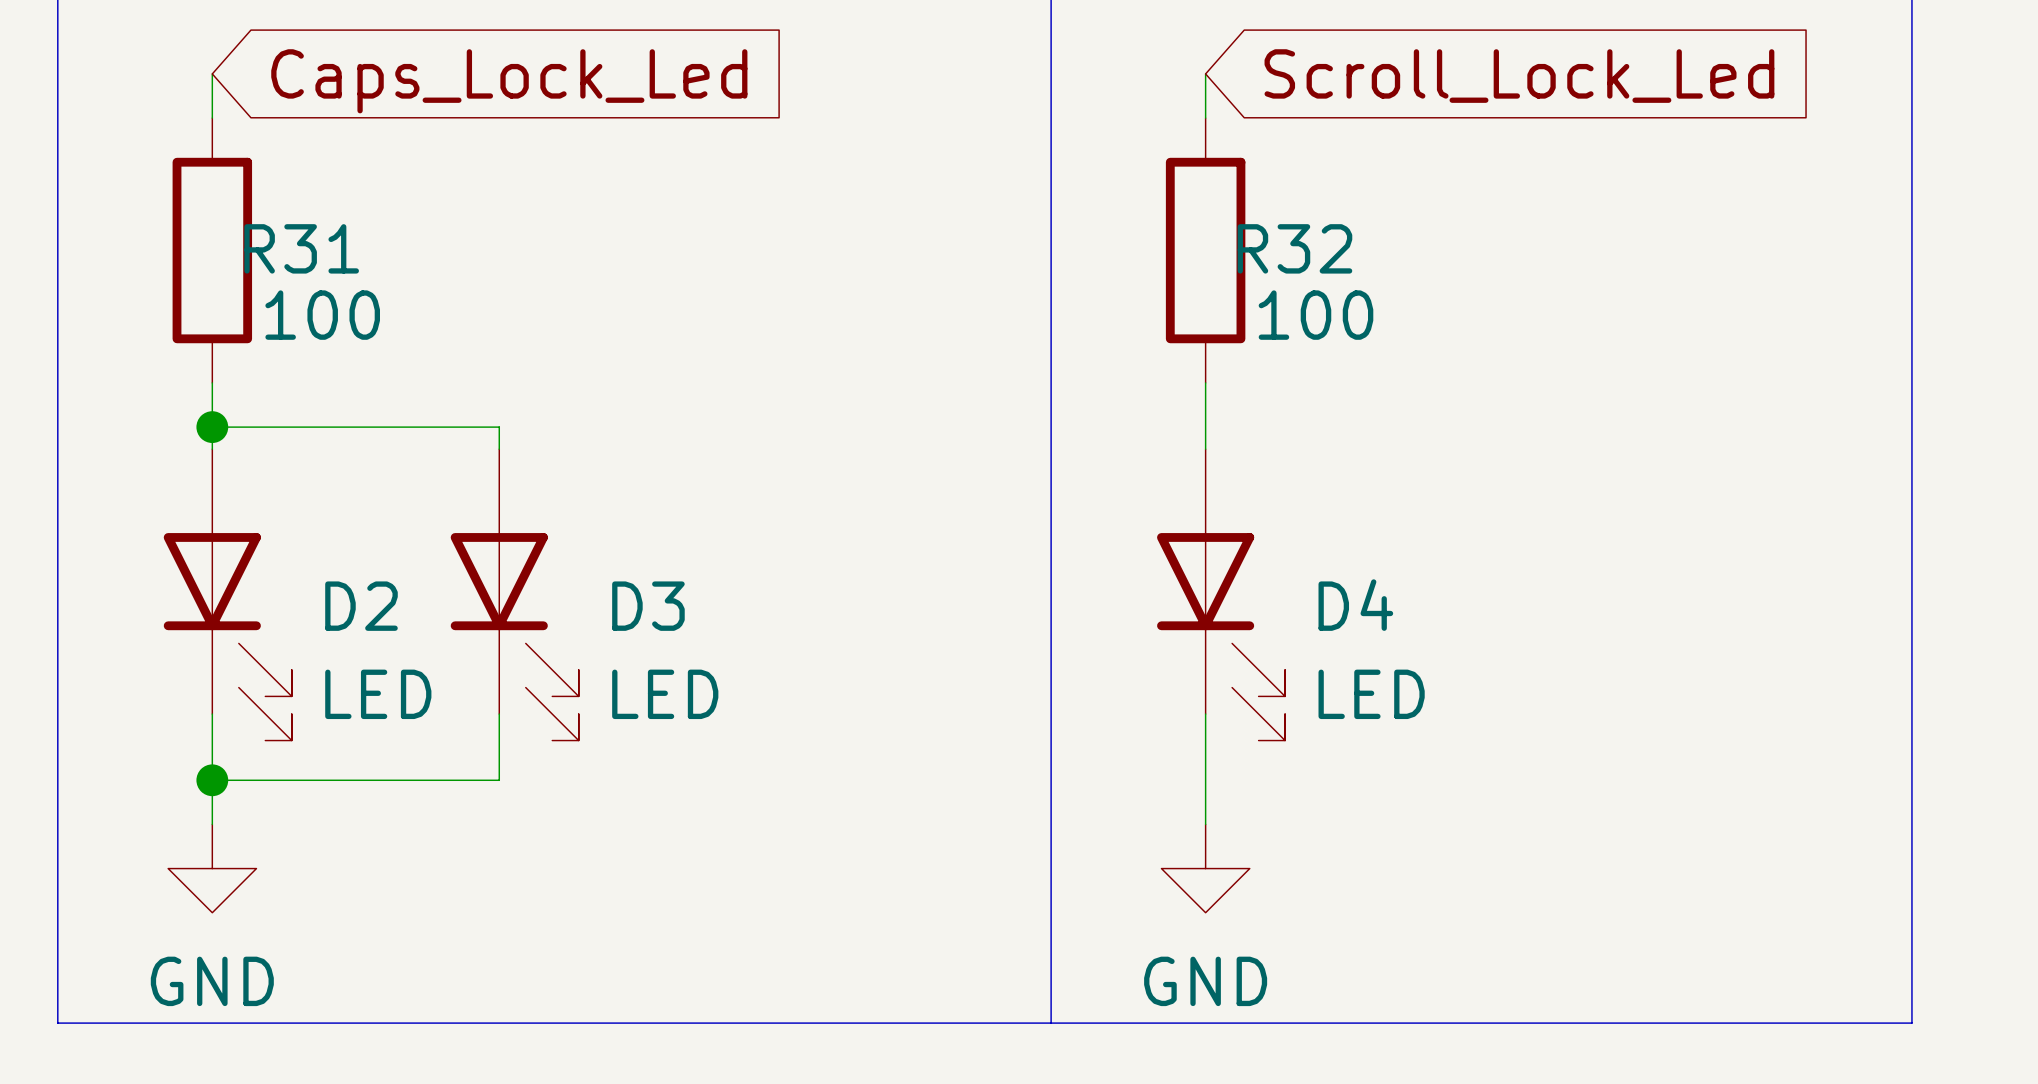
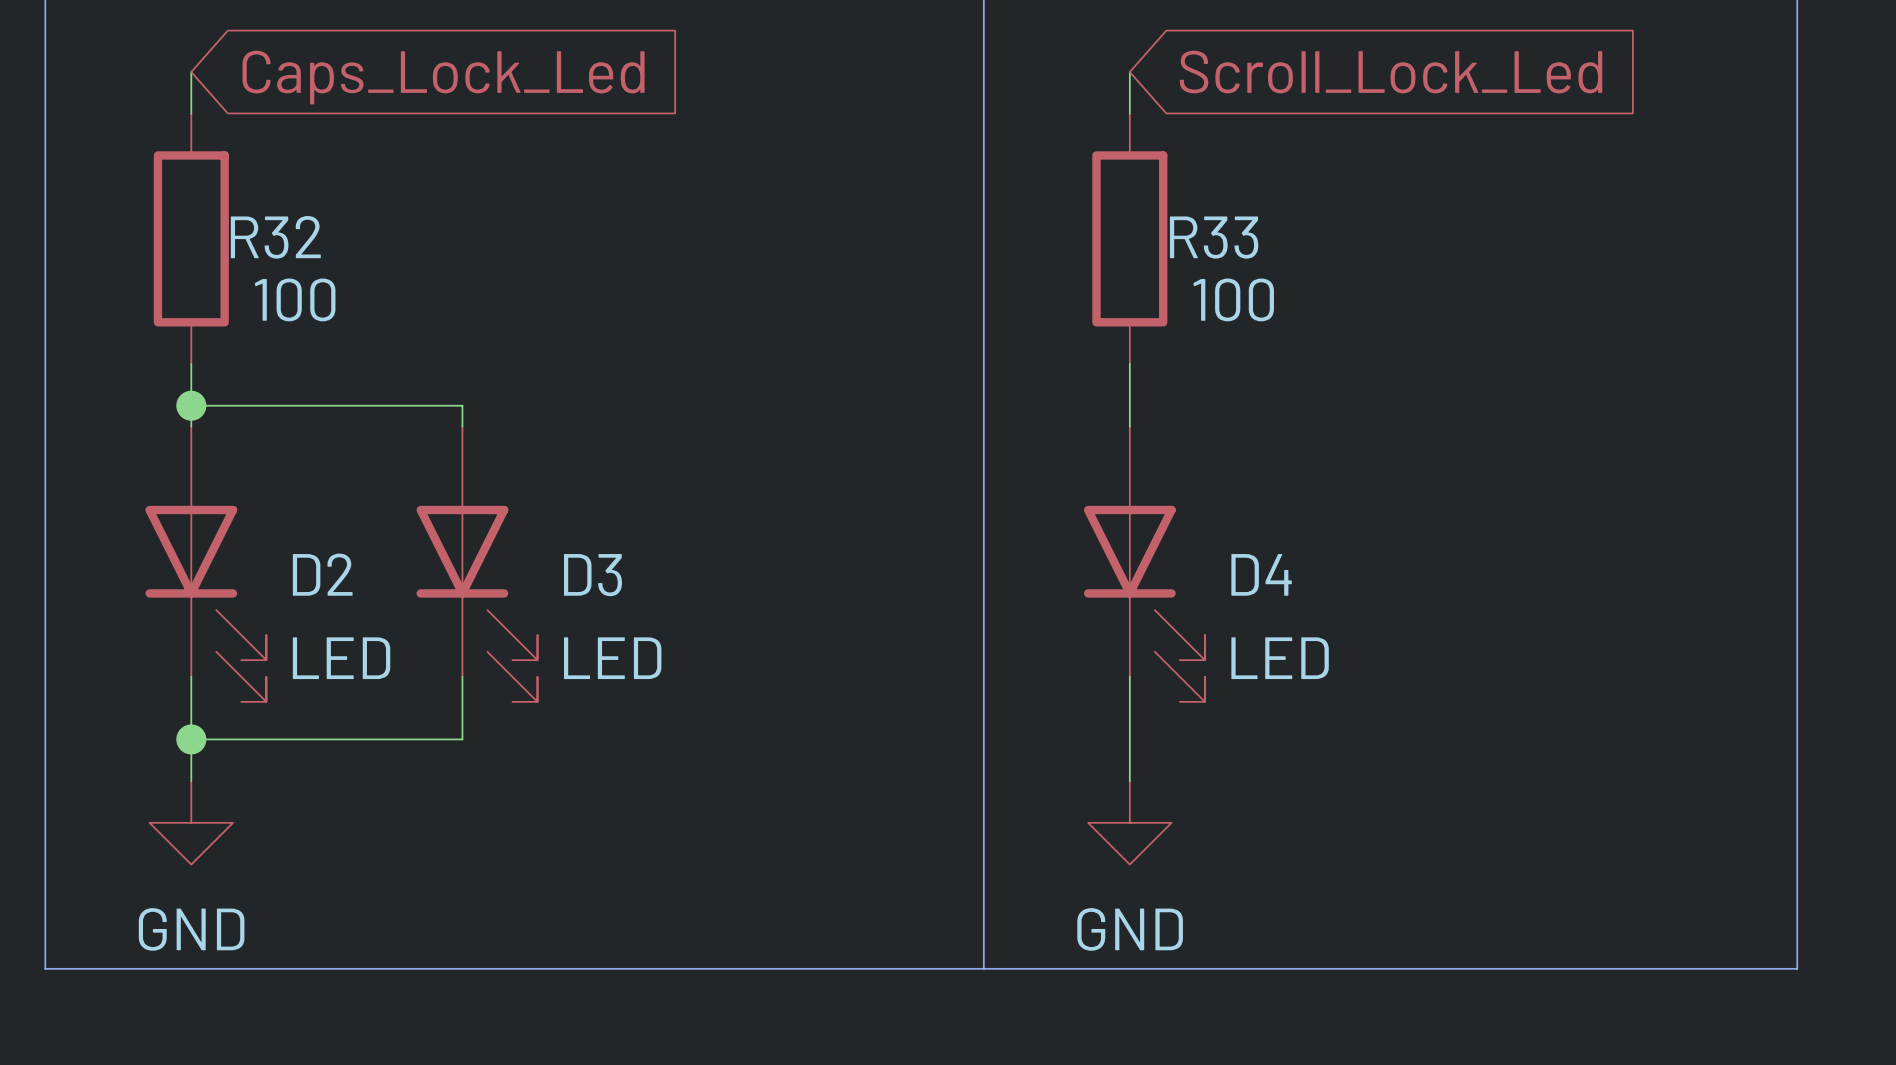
R31 name: R31 (301, 248) -> R32 (275, 237)
R32 name: R32 (1294, 248) -> R33 (1214, 237)

